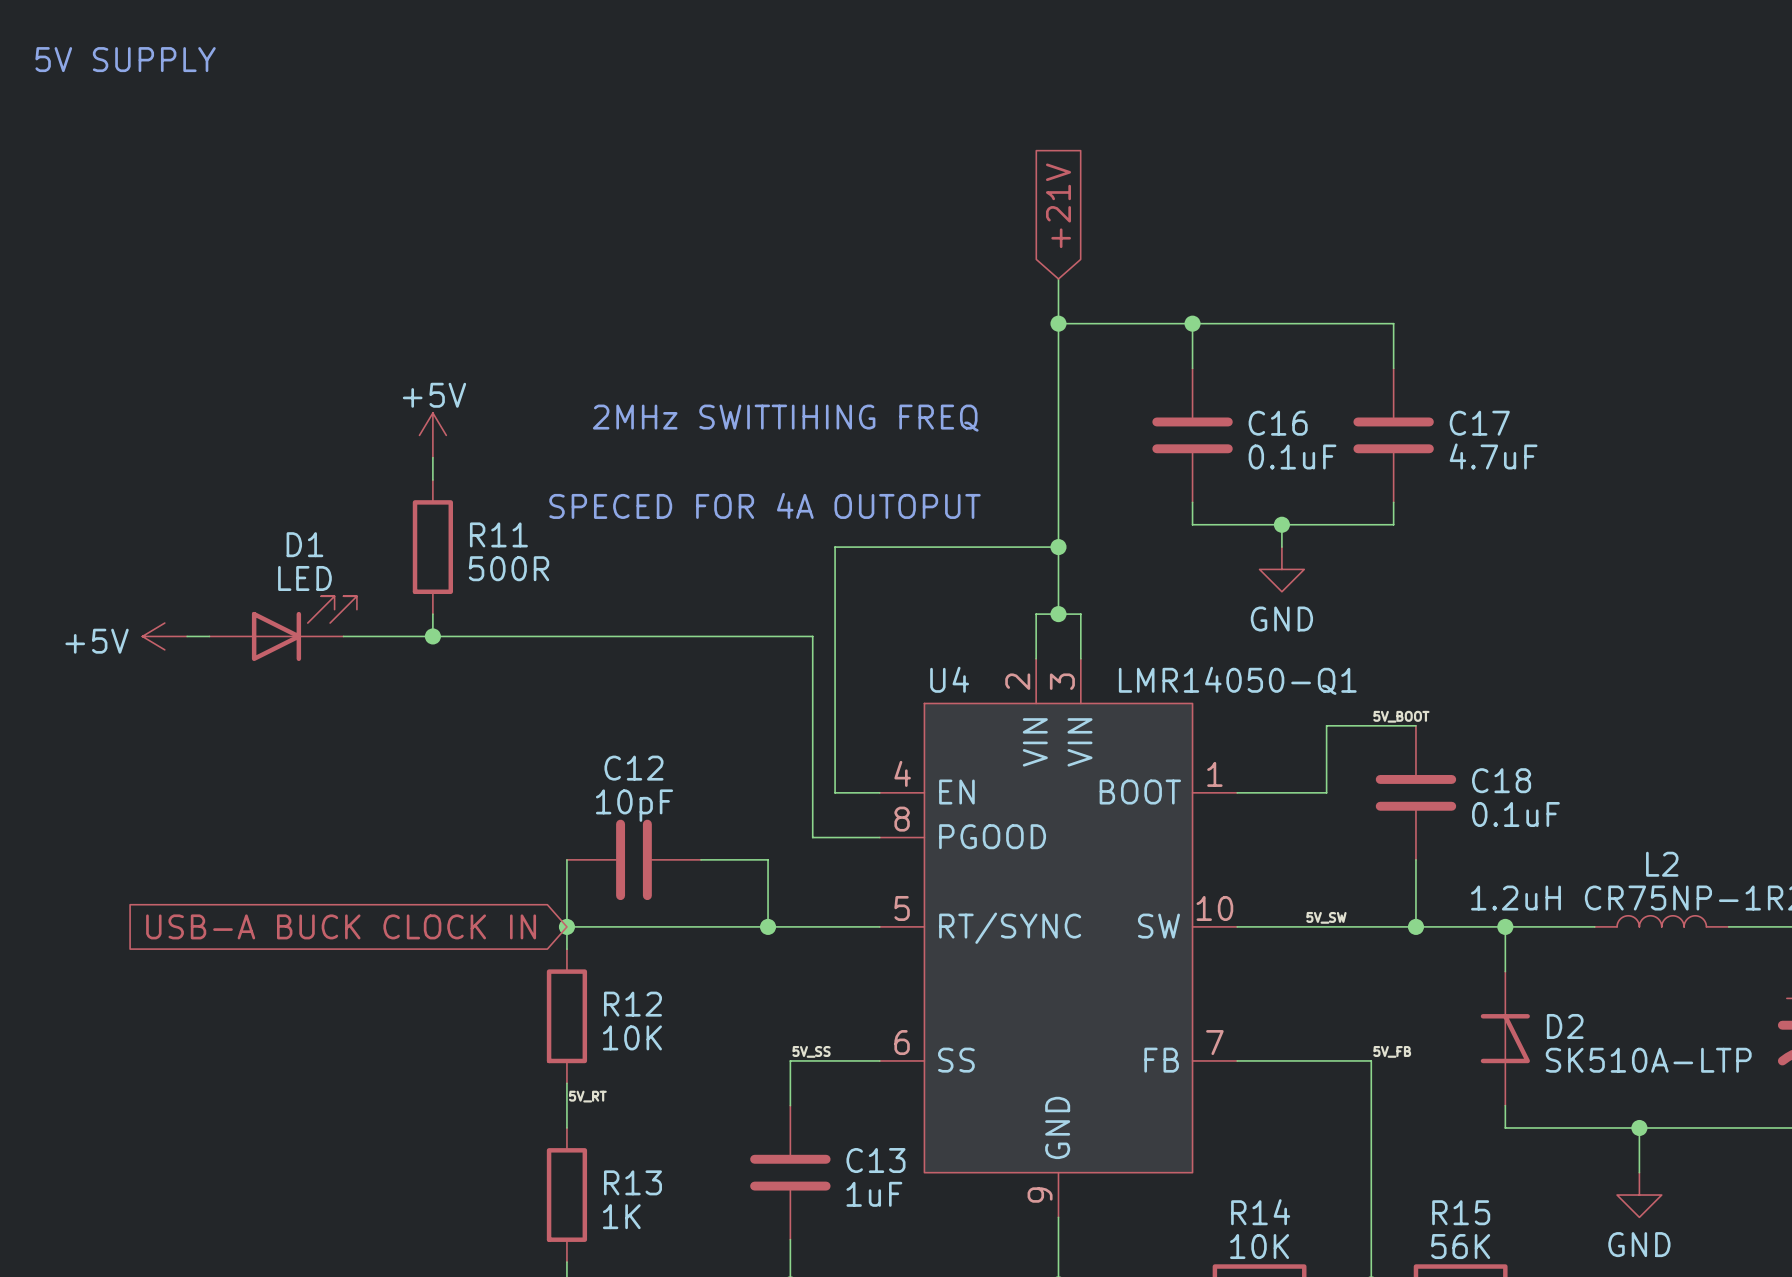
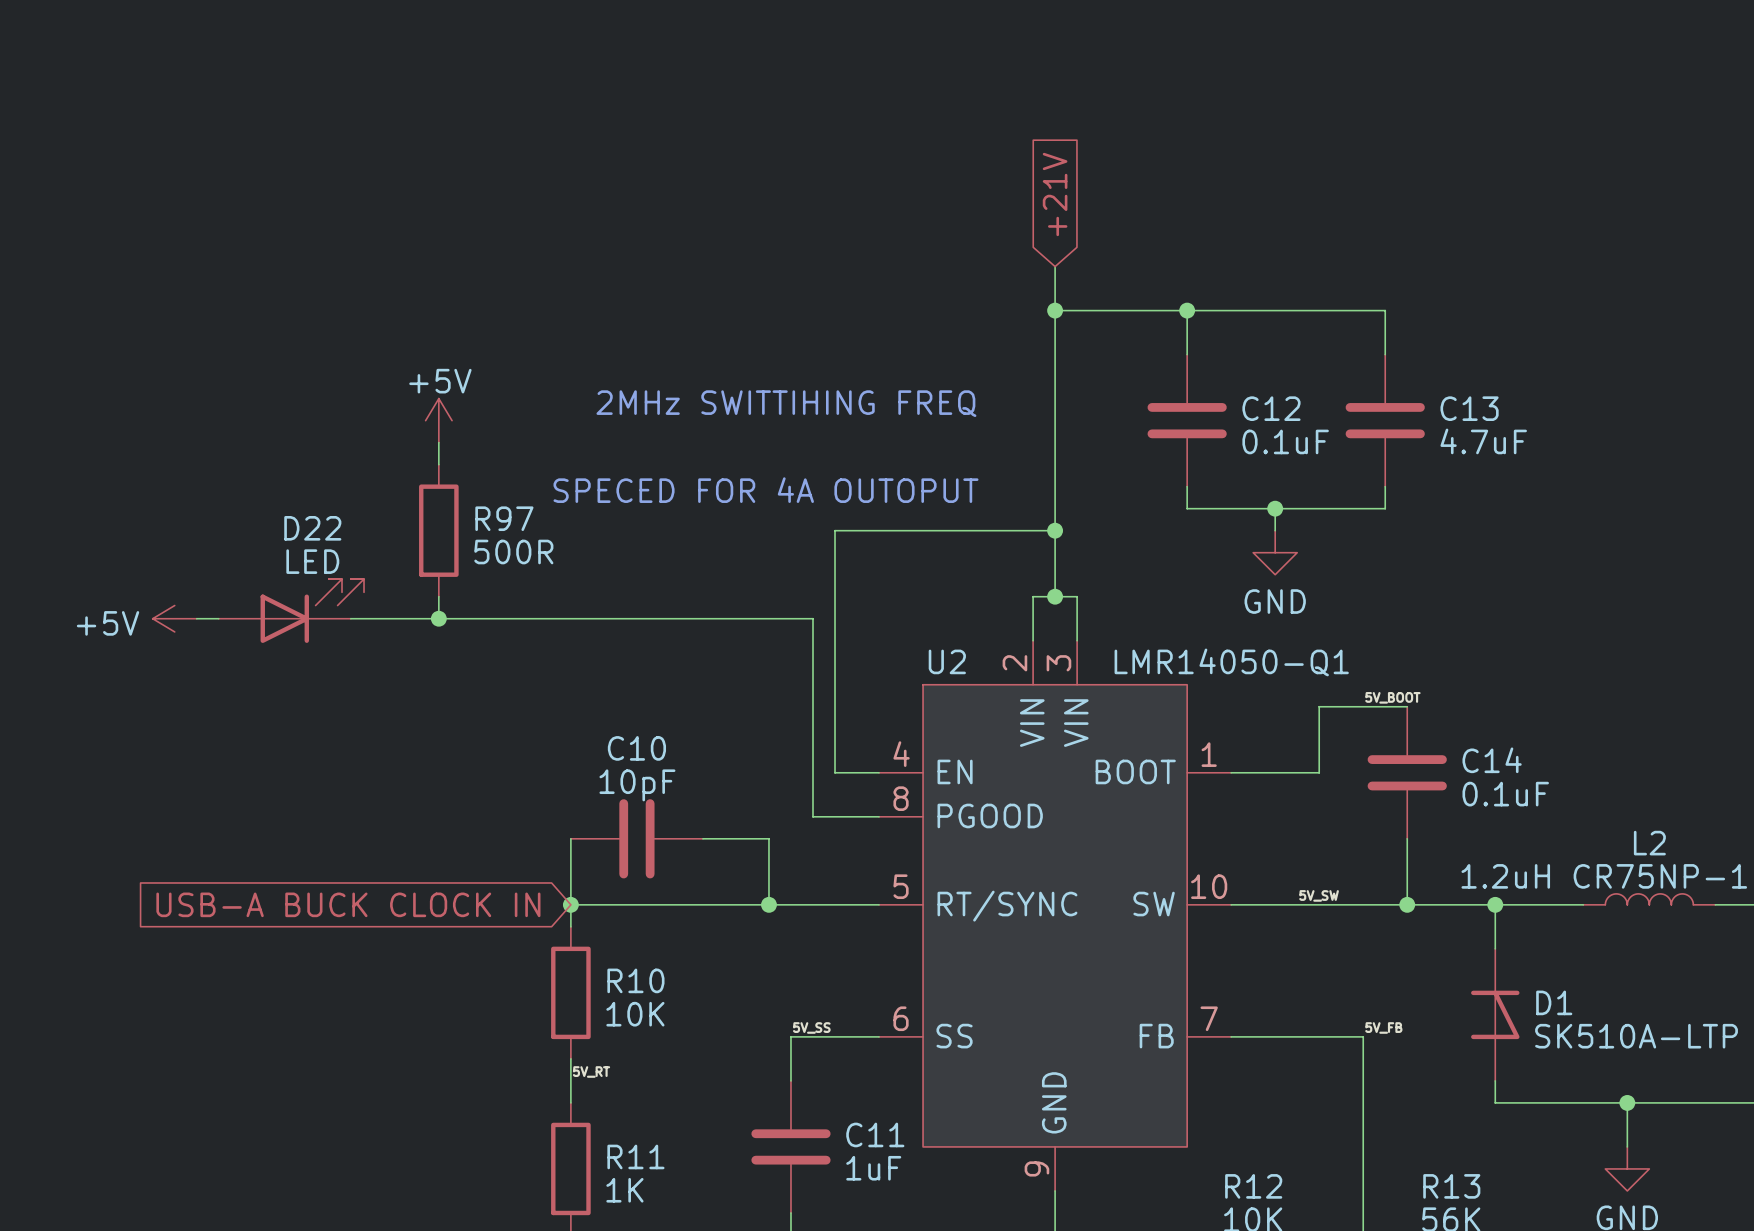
text: 5V SUPPLY (125, 59) -> none
C16 name: C16 (1278, 423) -> C12 (1271, 408)
C17 name: C17 (1479, 423) -> C13 (1469, 408)
R11 name: R11 (498, 534) -> R97 (504, 518)
D1 name: D1 (304, 544) -> D22 (312, 528)
U4 name: U4 (949, 679) -> U2 (947, 661)
C12 name: C12 (633, 768) -> C10 (636, 748)
C18 name: C18 (1501, 780) -> C14 (1492, 760)
R12 name: R12 (632, 1004) -> R10 (635, 980)
D2 name: D2 (1565, 1026) -> D1 (1554, 1002)
C13 name: C13 (875, 1160) -> C11 (875, 1134)
R13 name: R13 (632, 1182) -> R11 (635, 1156)
R14 name: R14 (1260, 1212) -> R12 (1253, 1186)
R15 name: R15 (1461, 1212) -> R13 (1451, 1186)

